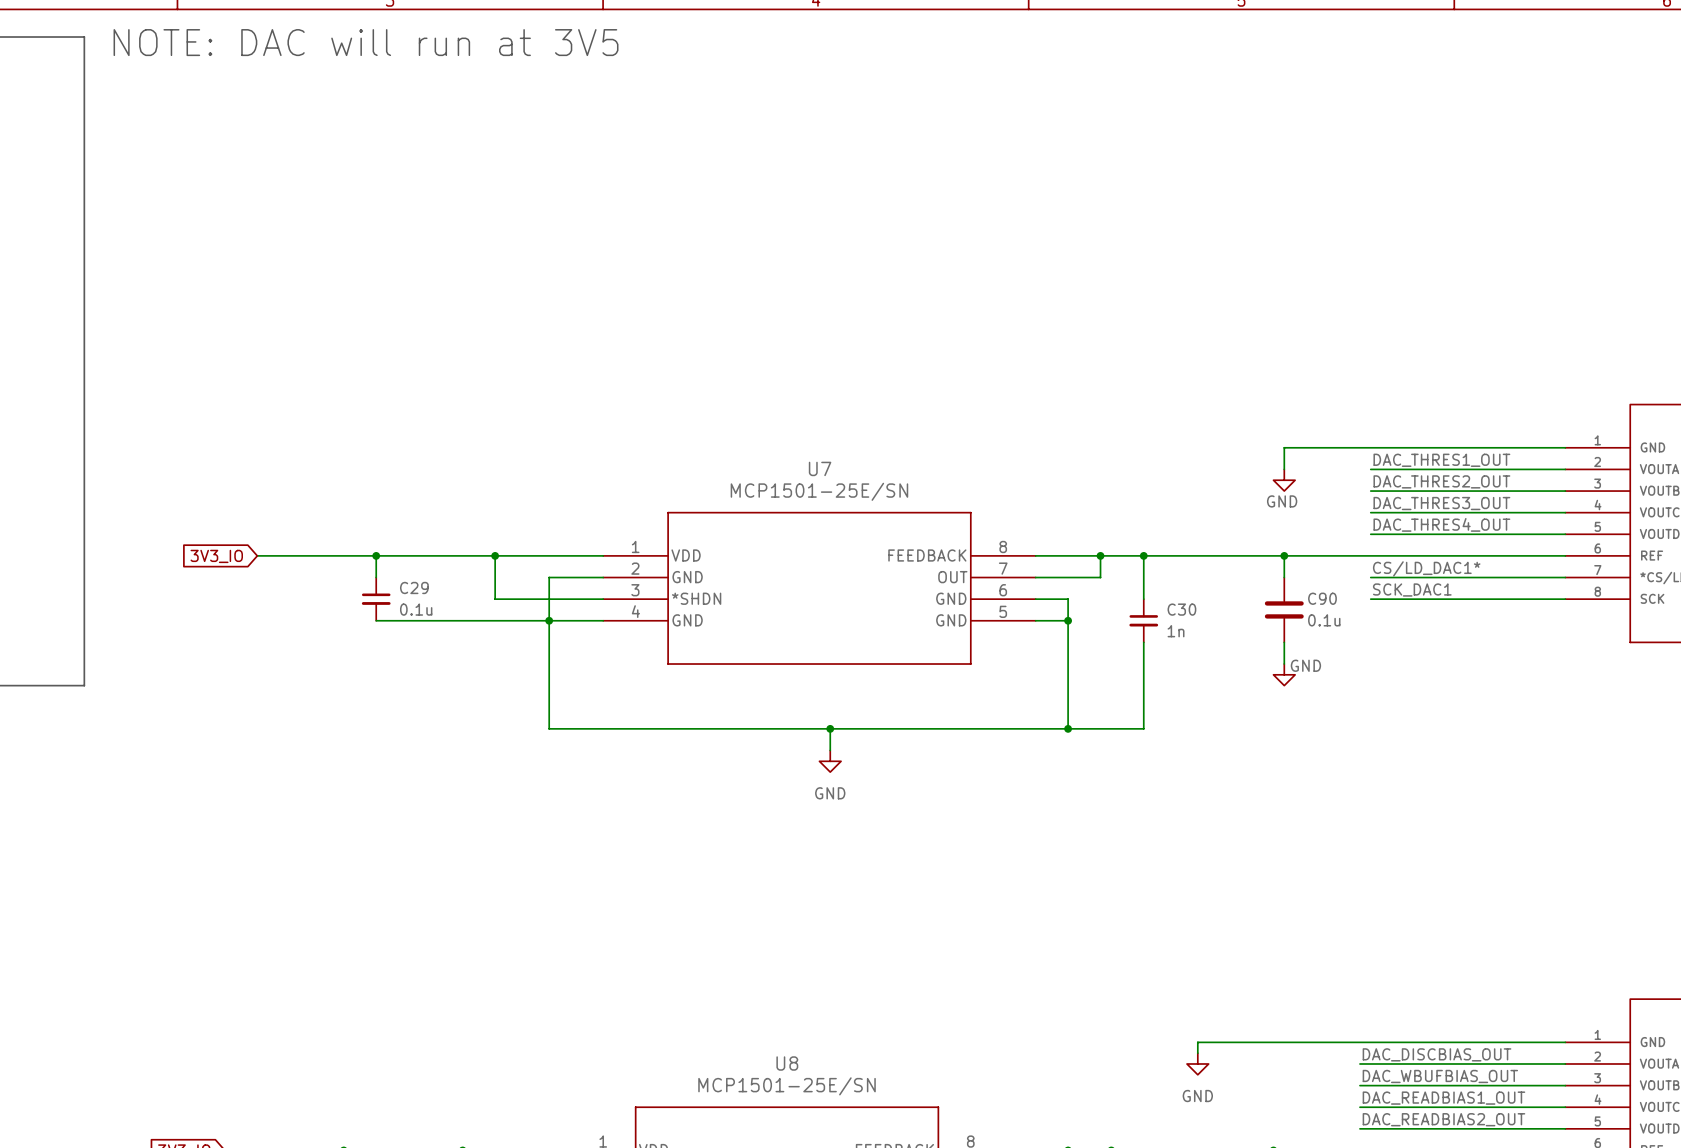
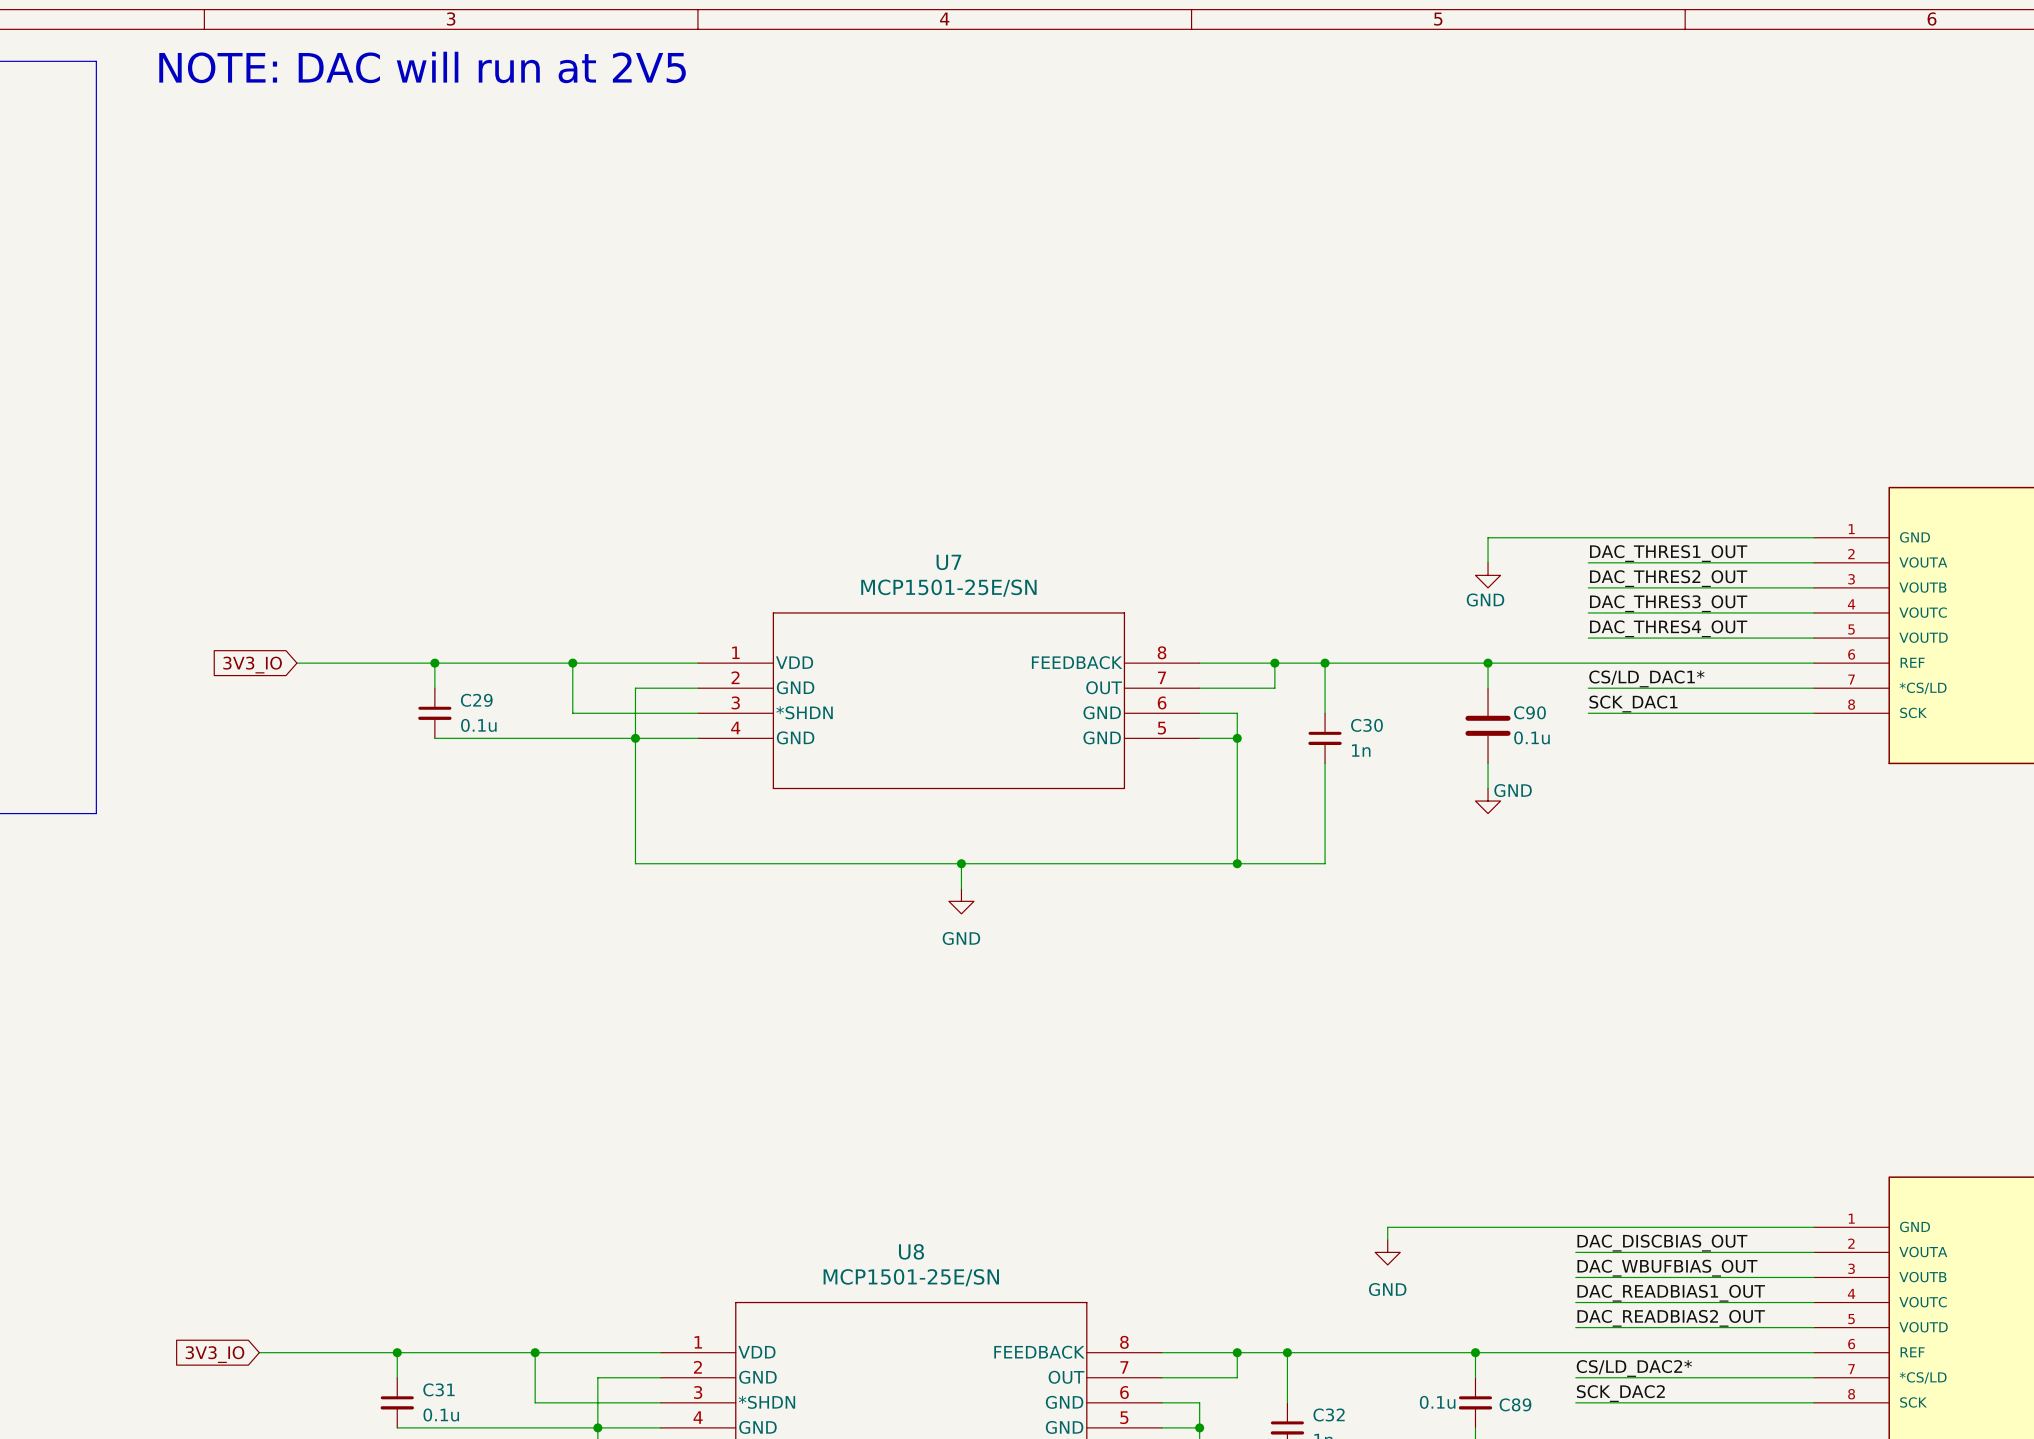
text: NOTE: DAC will run at 3V5 (366, 42) -> NOTE: DAC will run at 2V5 (422, 67)

